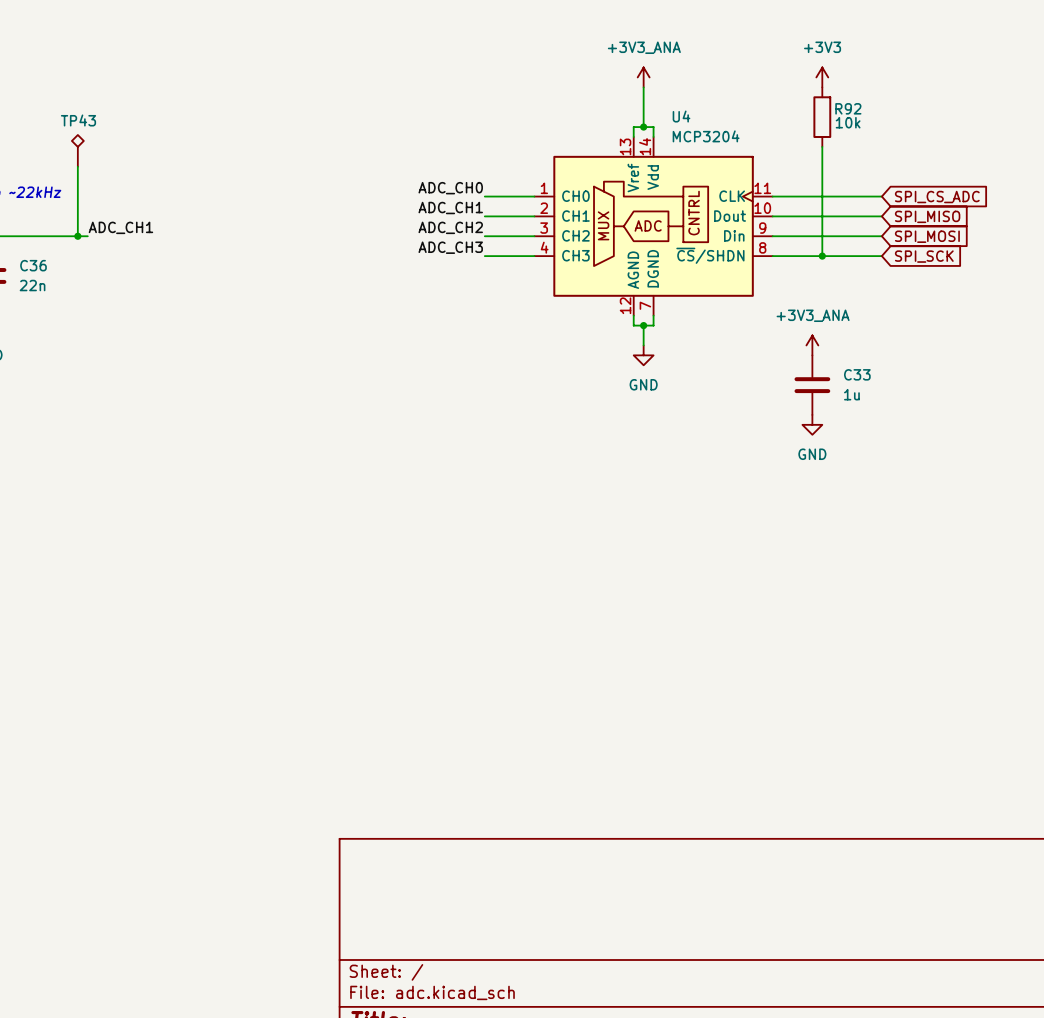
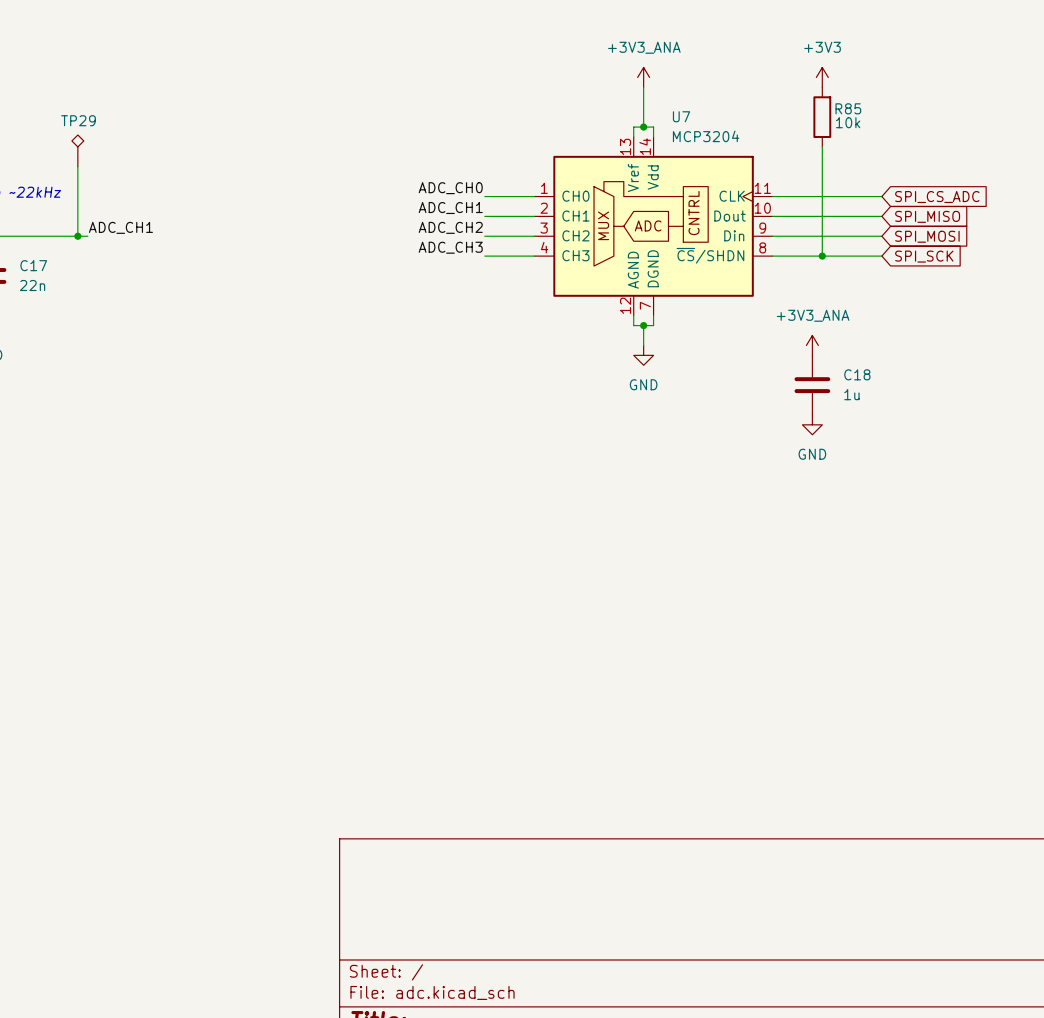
R92 name: R92 (848, 108) -> R85 (848, 108)
U4 name: U4 (681, 116) -> U7 (681, 116)
TP43 name: TP43 (78, 120) -> TP29 (78, 120)
C36 name: C36 (33, 265) -> C17 (33, 265)
C33 name: C33 (857, 374) -> C18 (857, 374)

